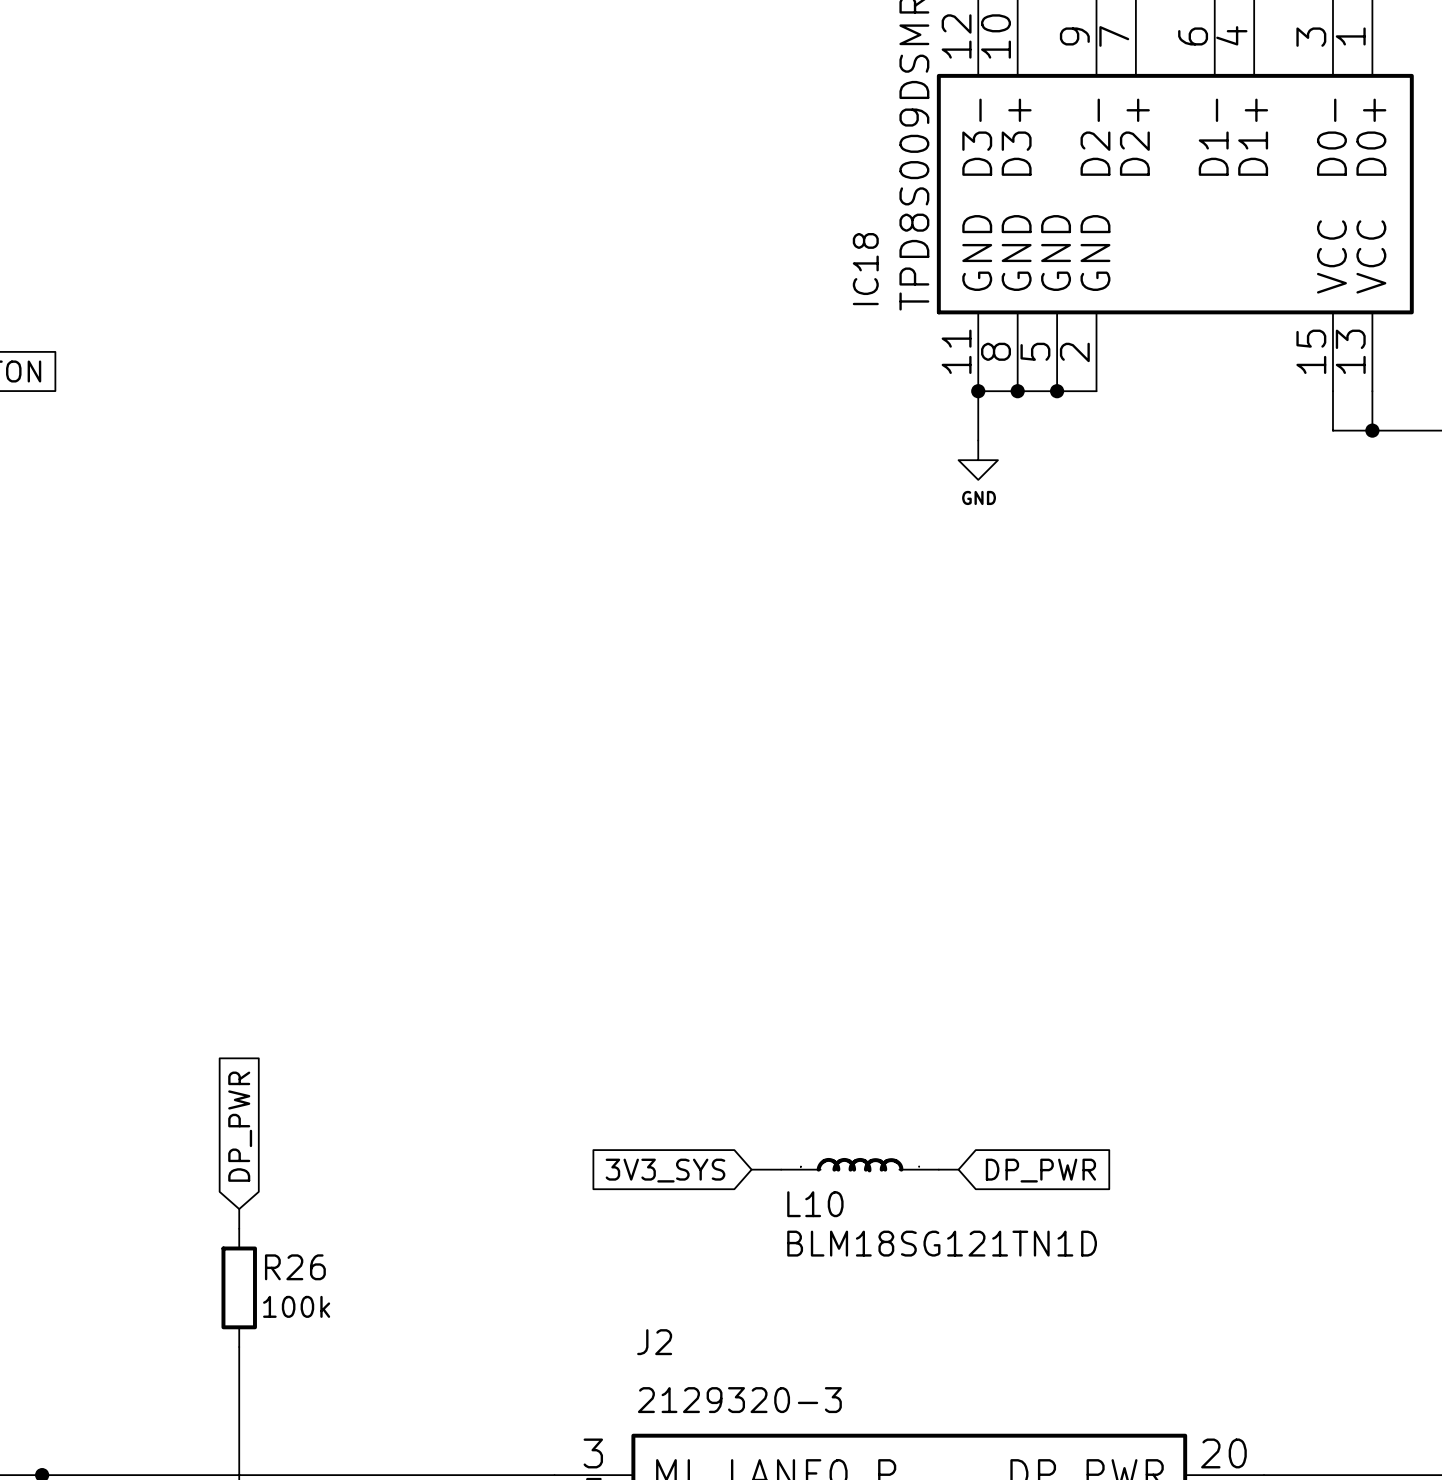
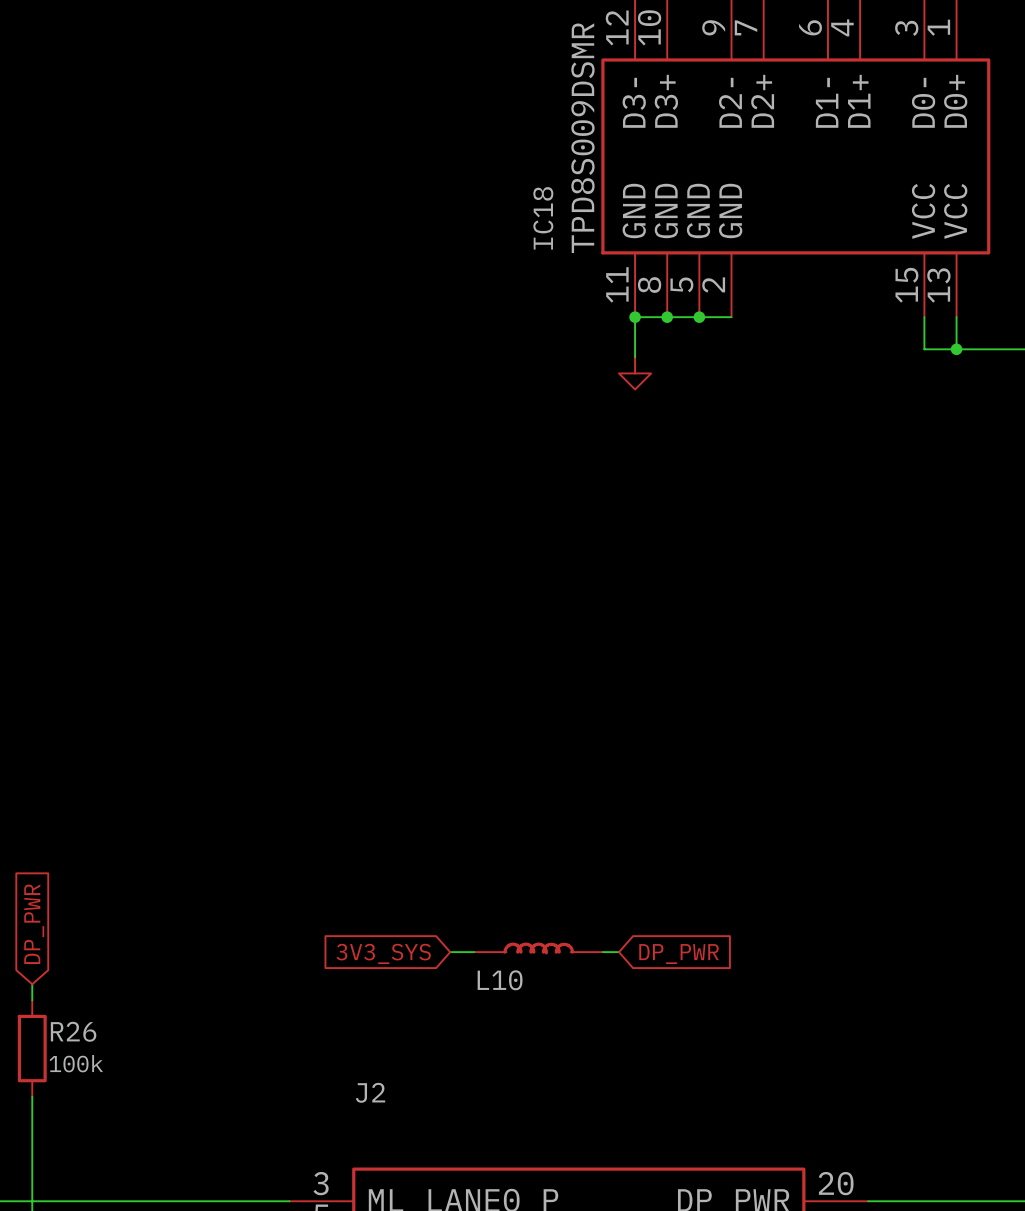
power symbol text: GND (979, 497) -> none
L10 value: BLM18SG121TN1D (942, 1243) -> none
J2 value: 2129320-3 (739, 1400) -> none

